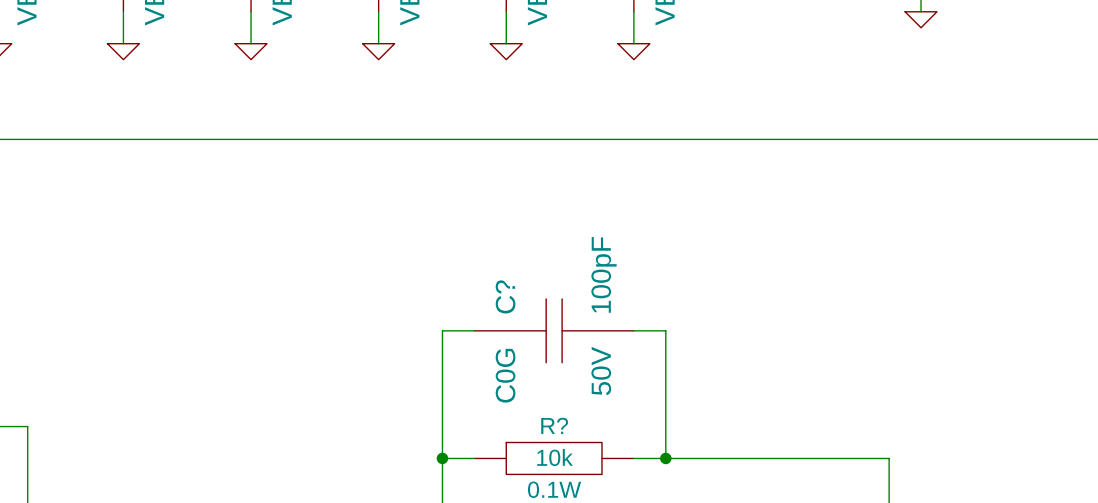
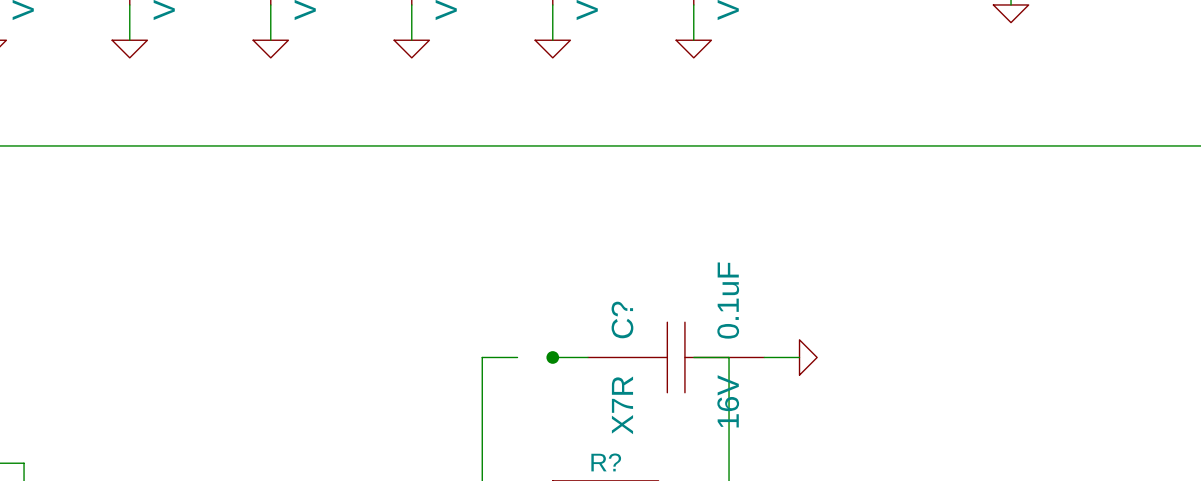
junction: none -> (552, 357)
C?: 100pF (554, 330) -> none
C?: none -> 0.1uF (676, 357)
wire: none -> (764, 357) (799, 357)
power symbol: none -> (808, 357)

